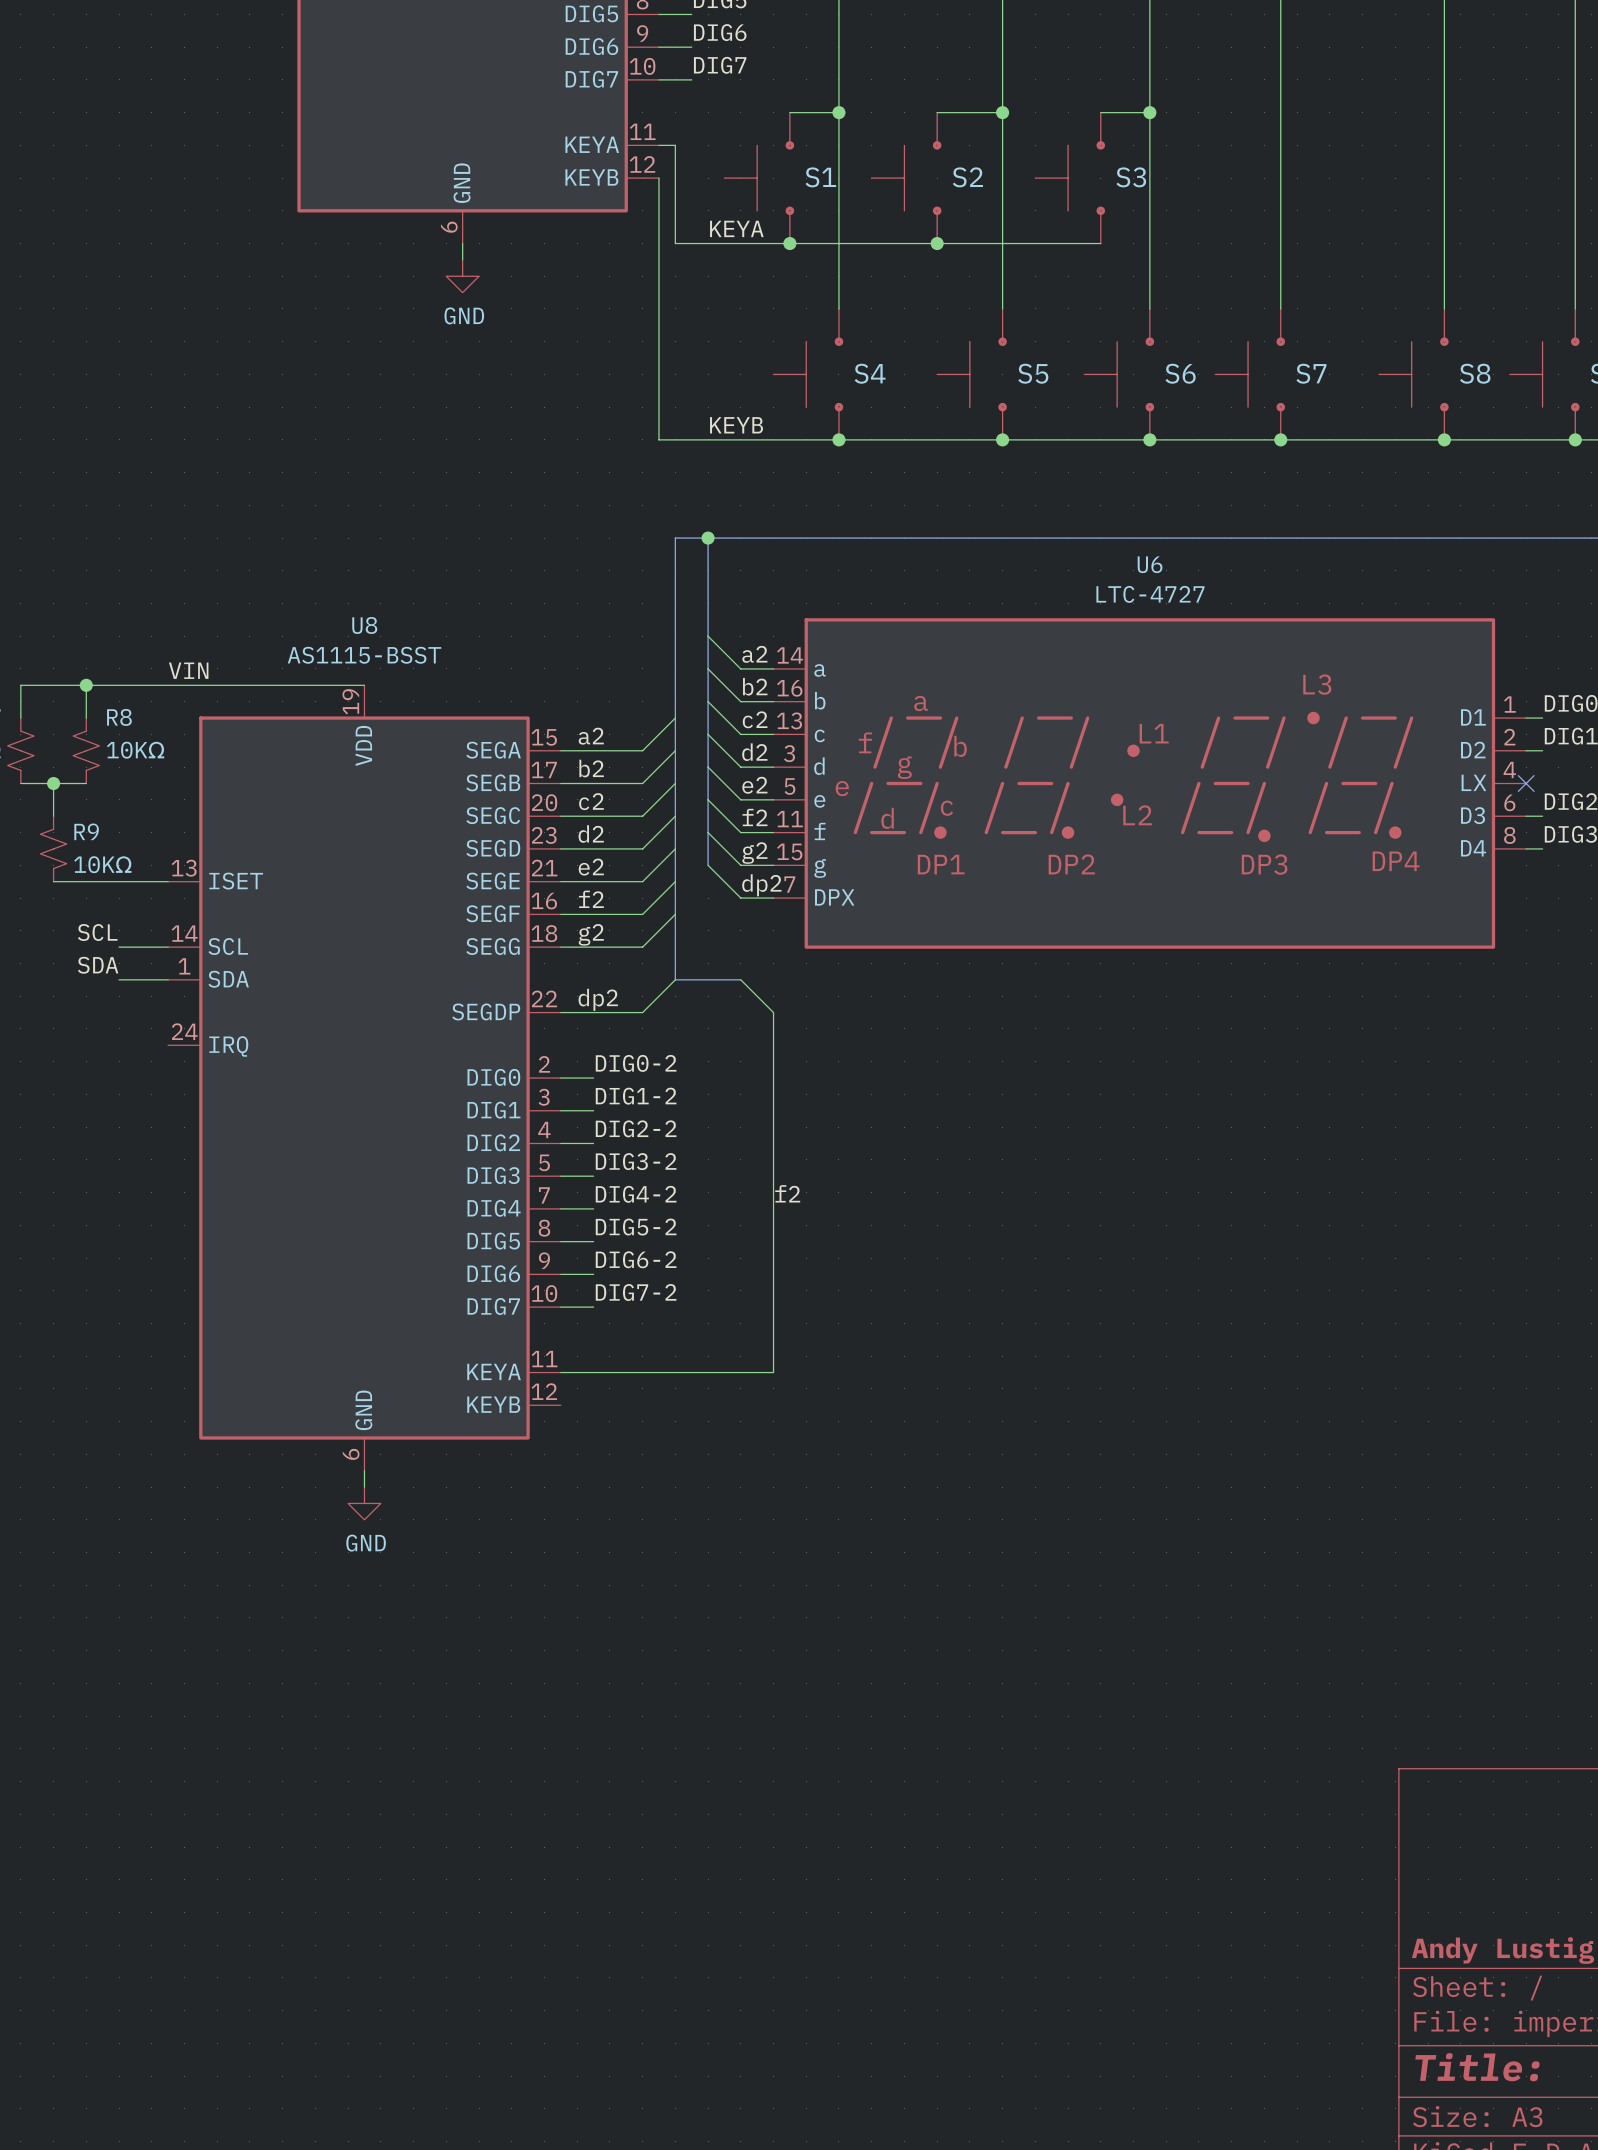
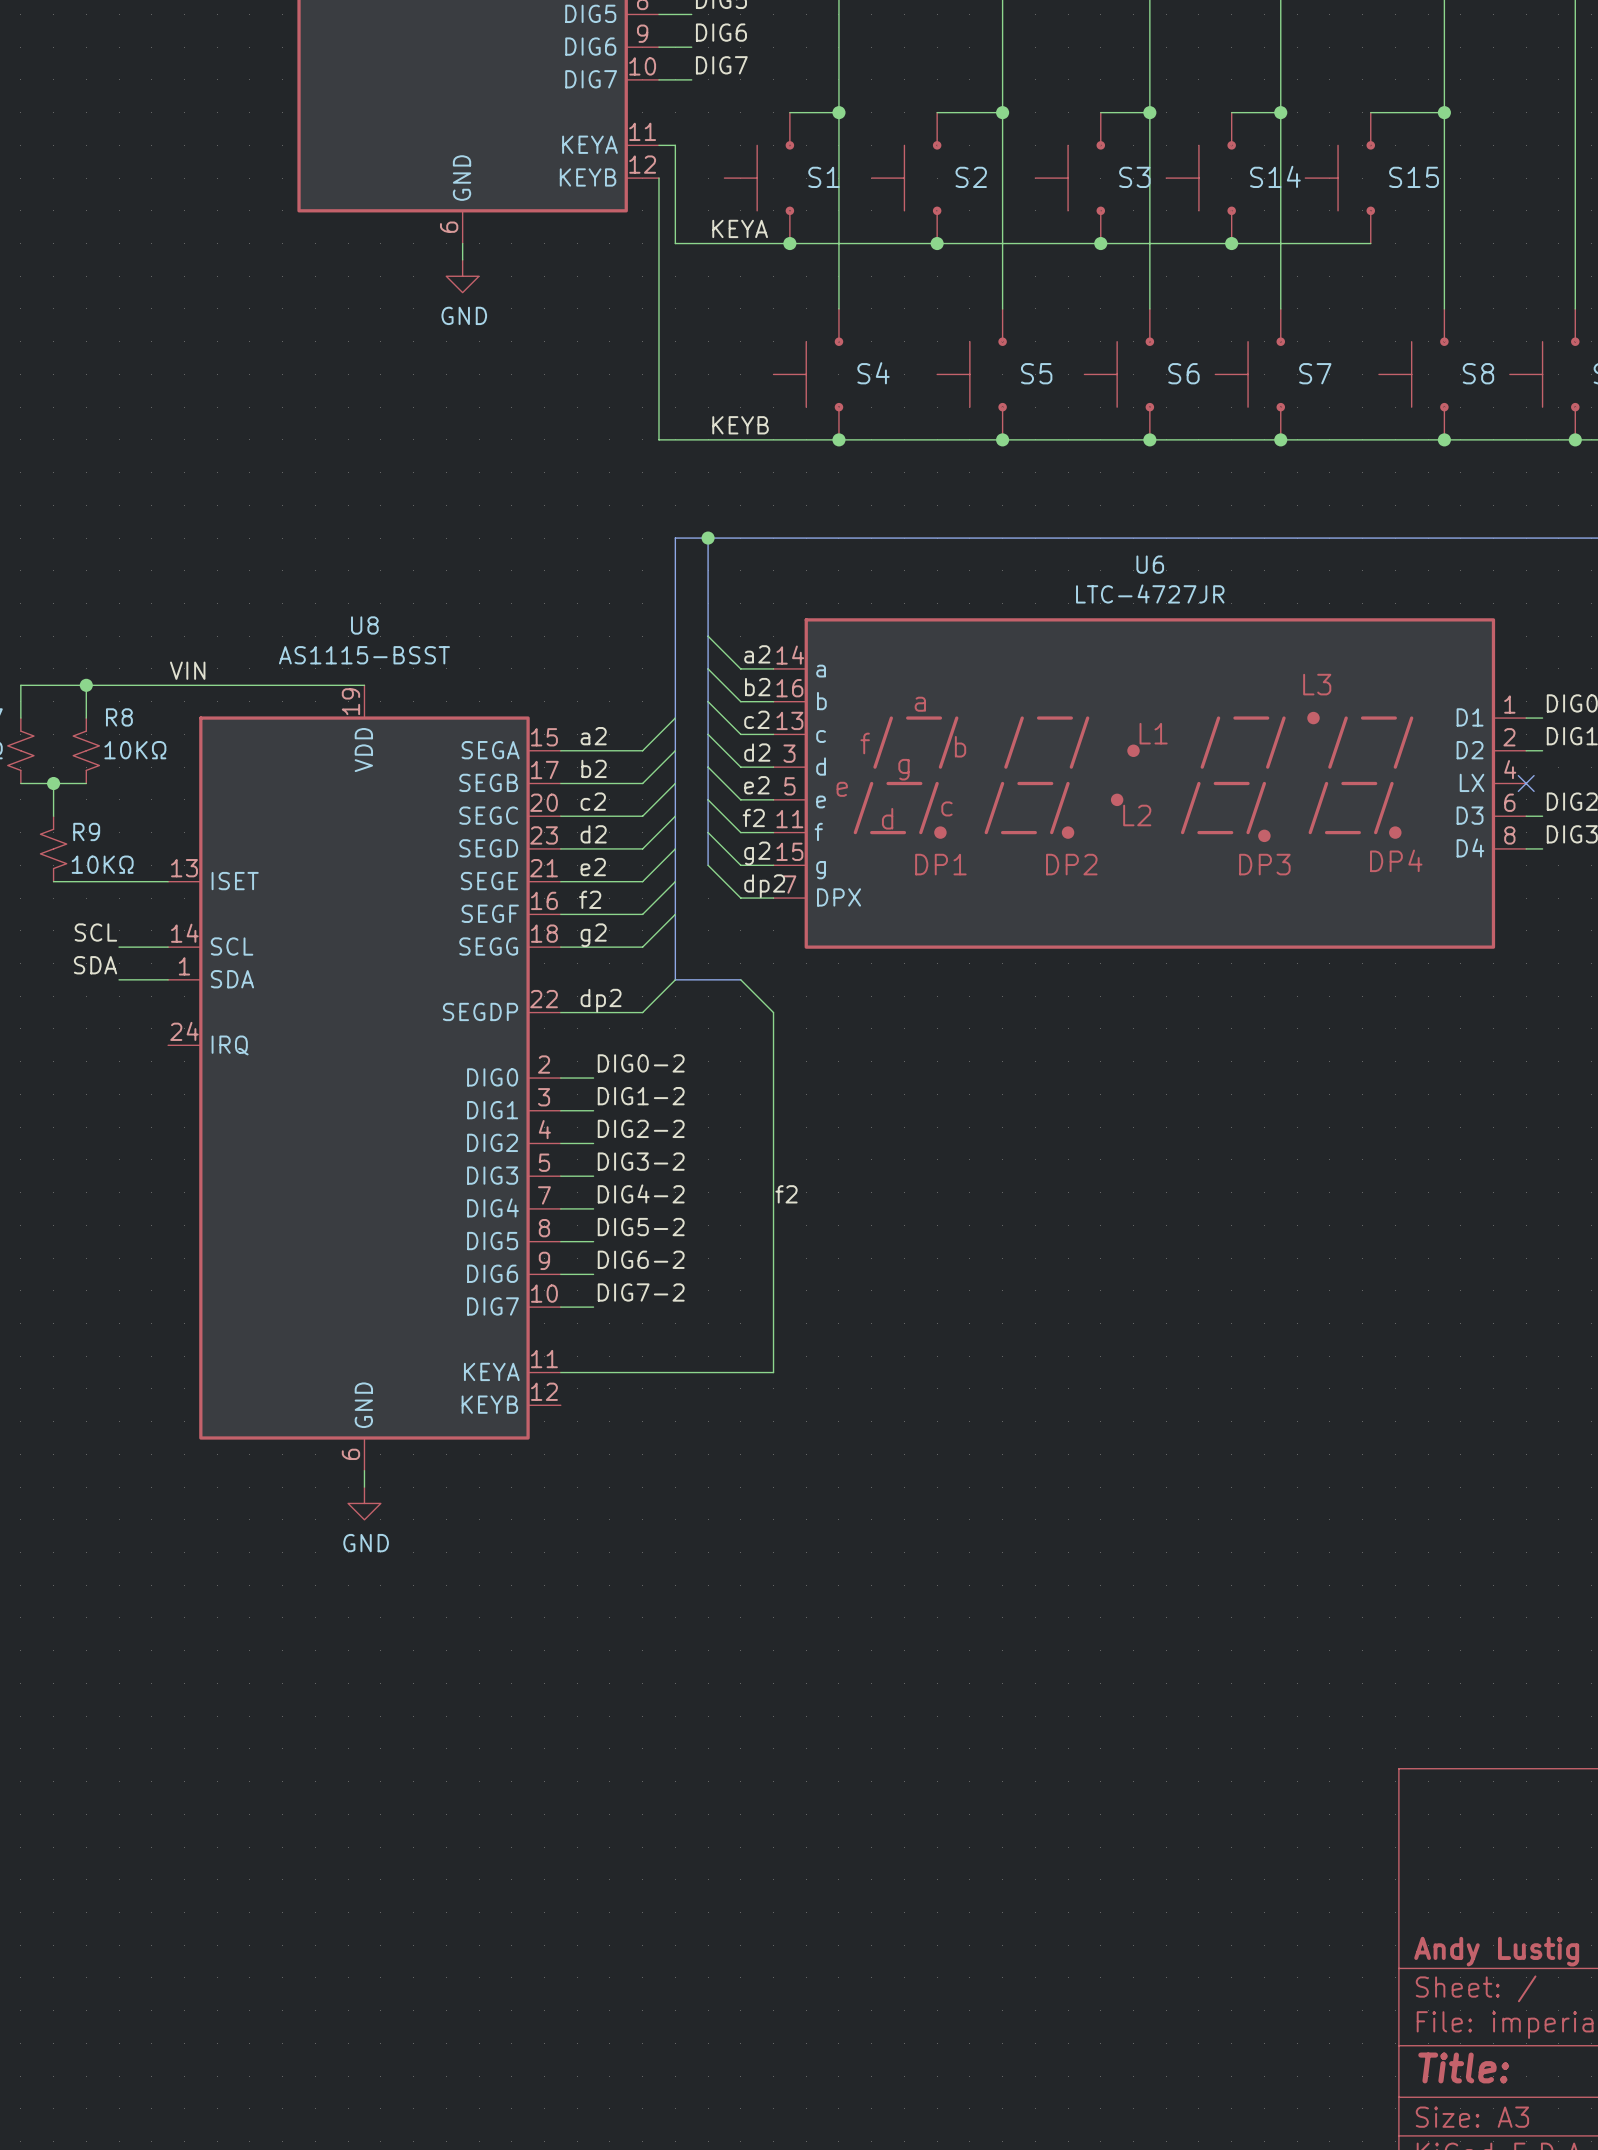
wire: none -> (1231, 112) (1280, 112)
junction: none -> (1280, 112)
wire: none -> (1370, 112) (1444, 112)
junction: none -> (1444, 112)
S14: none -> (1201, 178)
S15: none -> (1340, 178)
wire: none -> (1100, 243) (1370, 243)
junction: none -> (1100, 243)
junction: none -> (1231, 243)
U6 value: LTC-4727 (1150, 594) -> LTC-4727JR (1150, 594)

